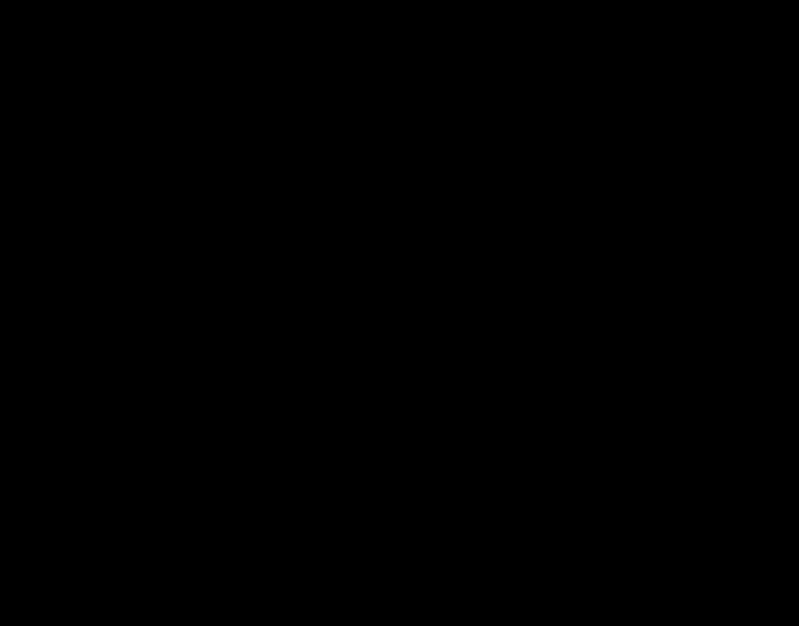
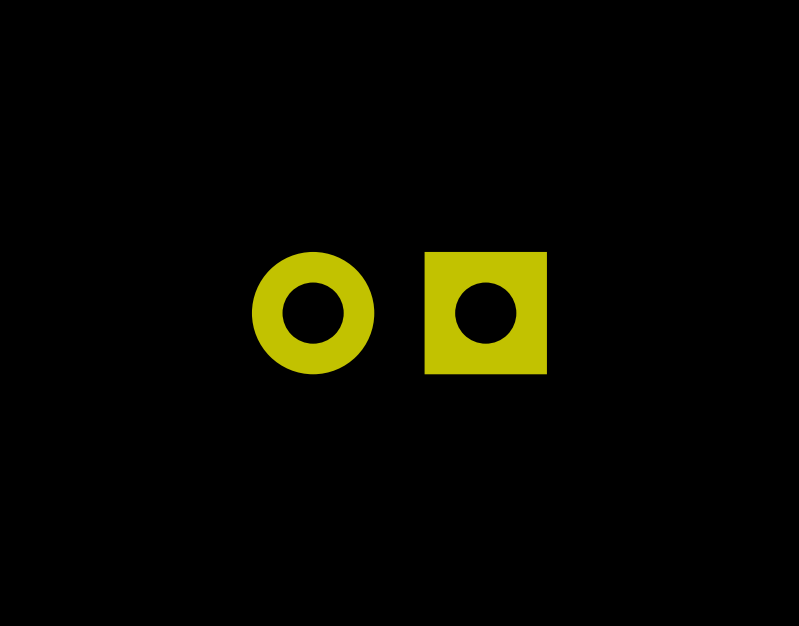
part: none -> (399, 313)

